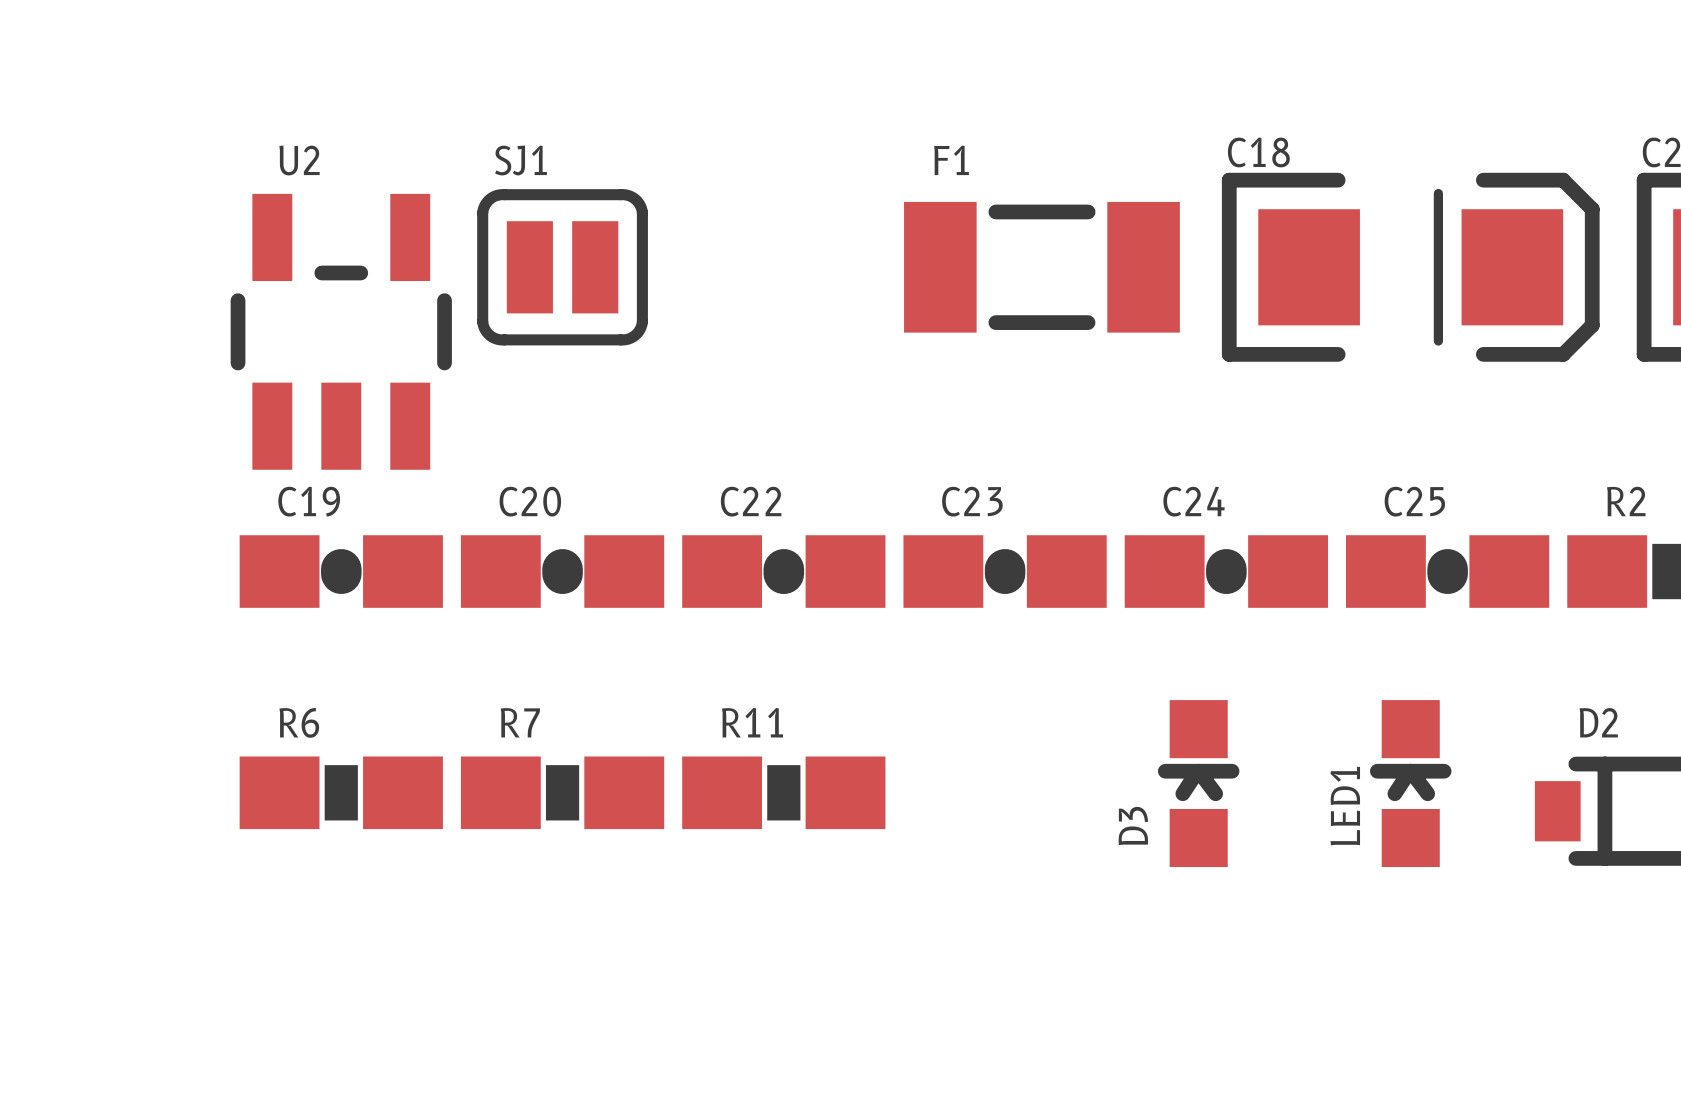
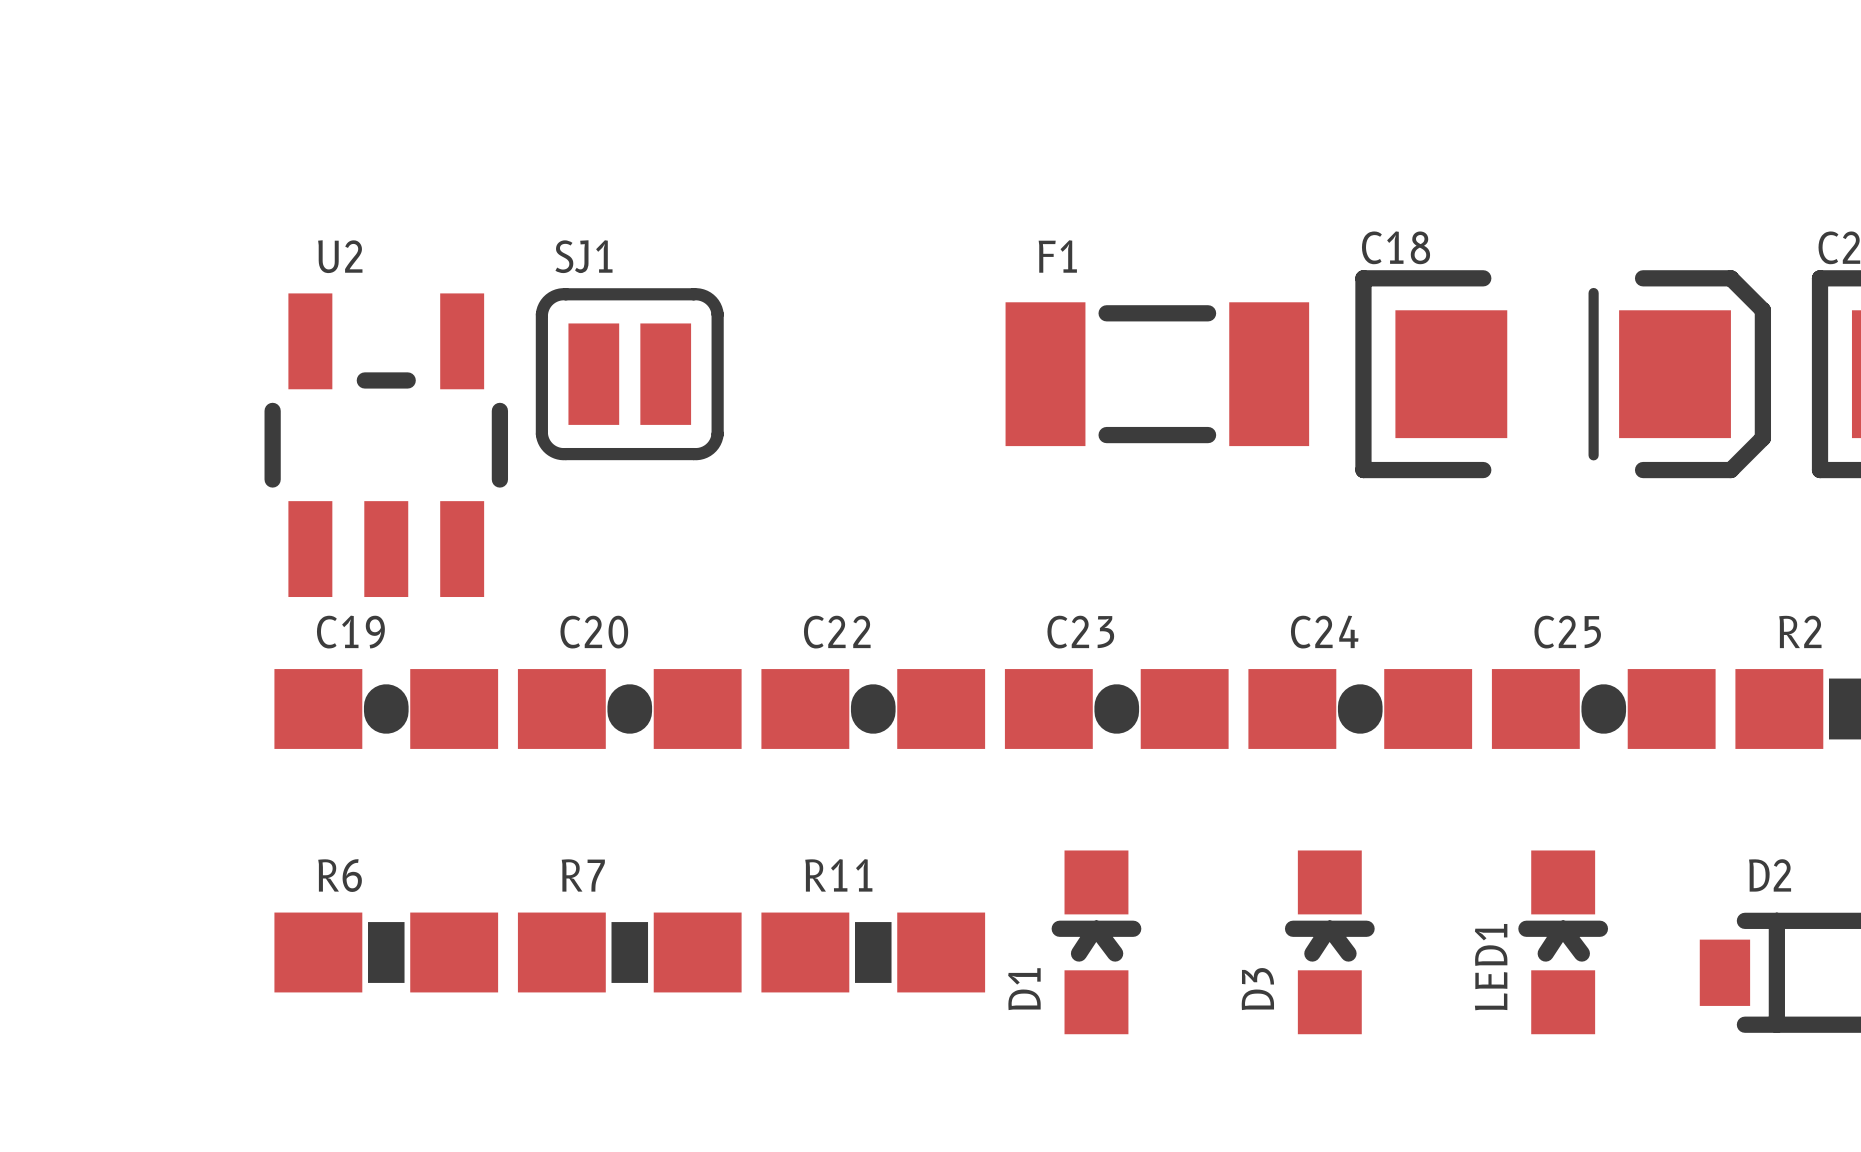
D1: none -> (1096, 942)

